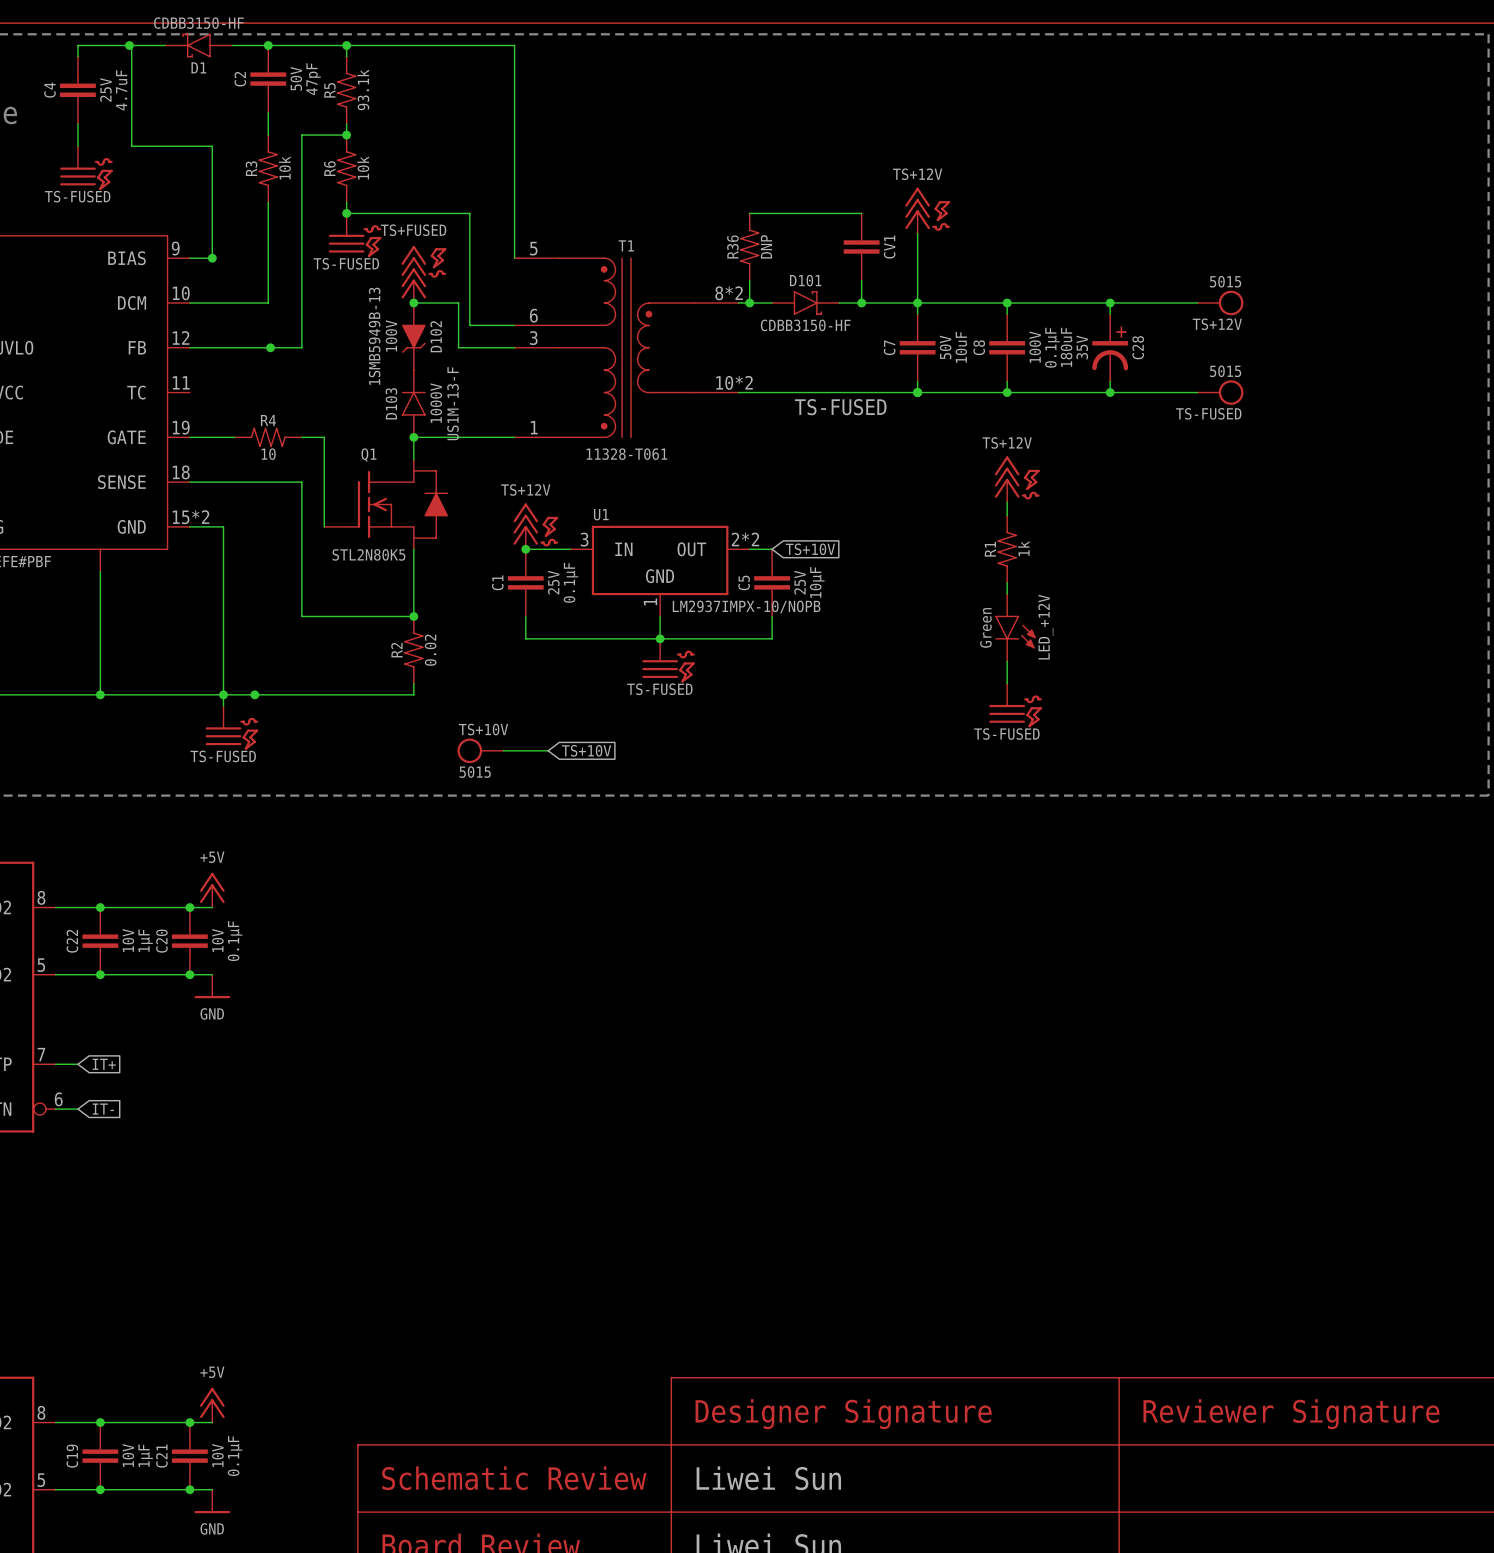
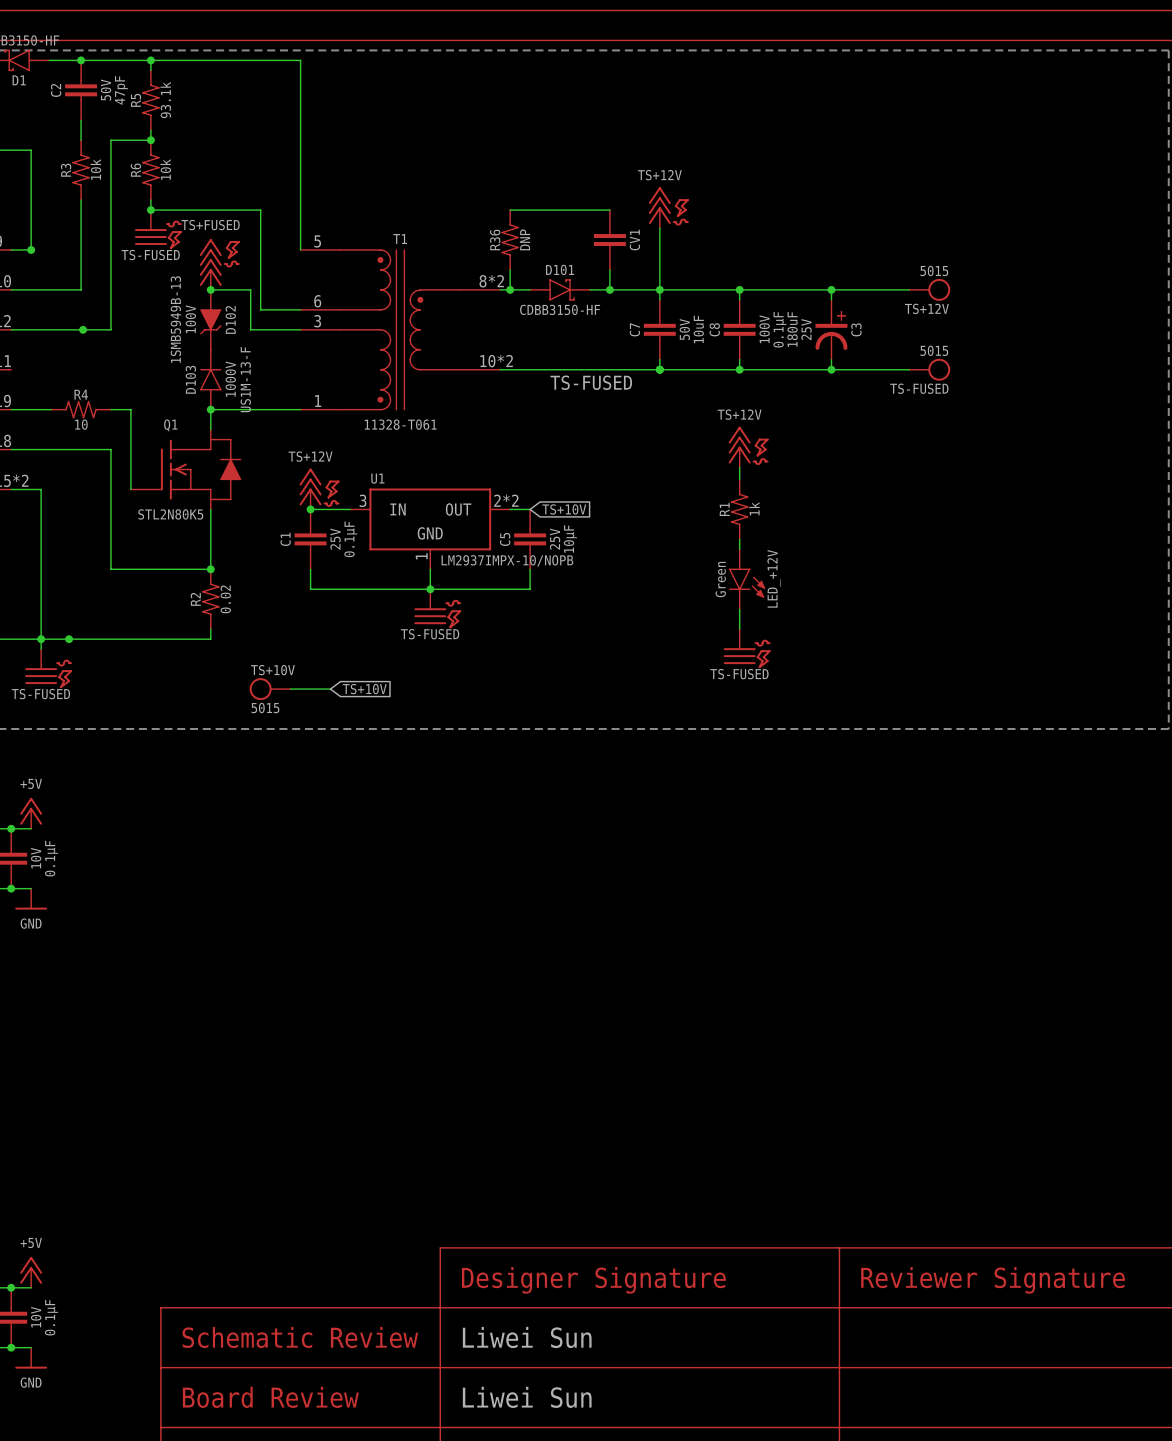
C28 text: 35V (1082, 347) -> 25V (806, 329)
C28 name: C28 (1138, 347) -> C3 (856, 329)

